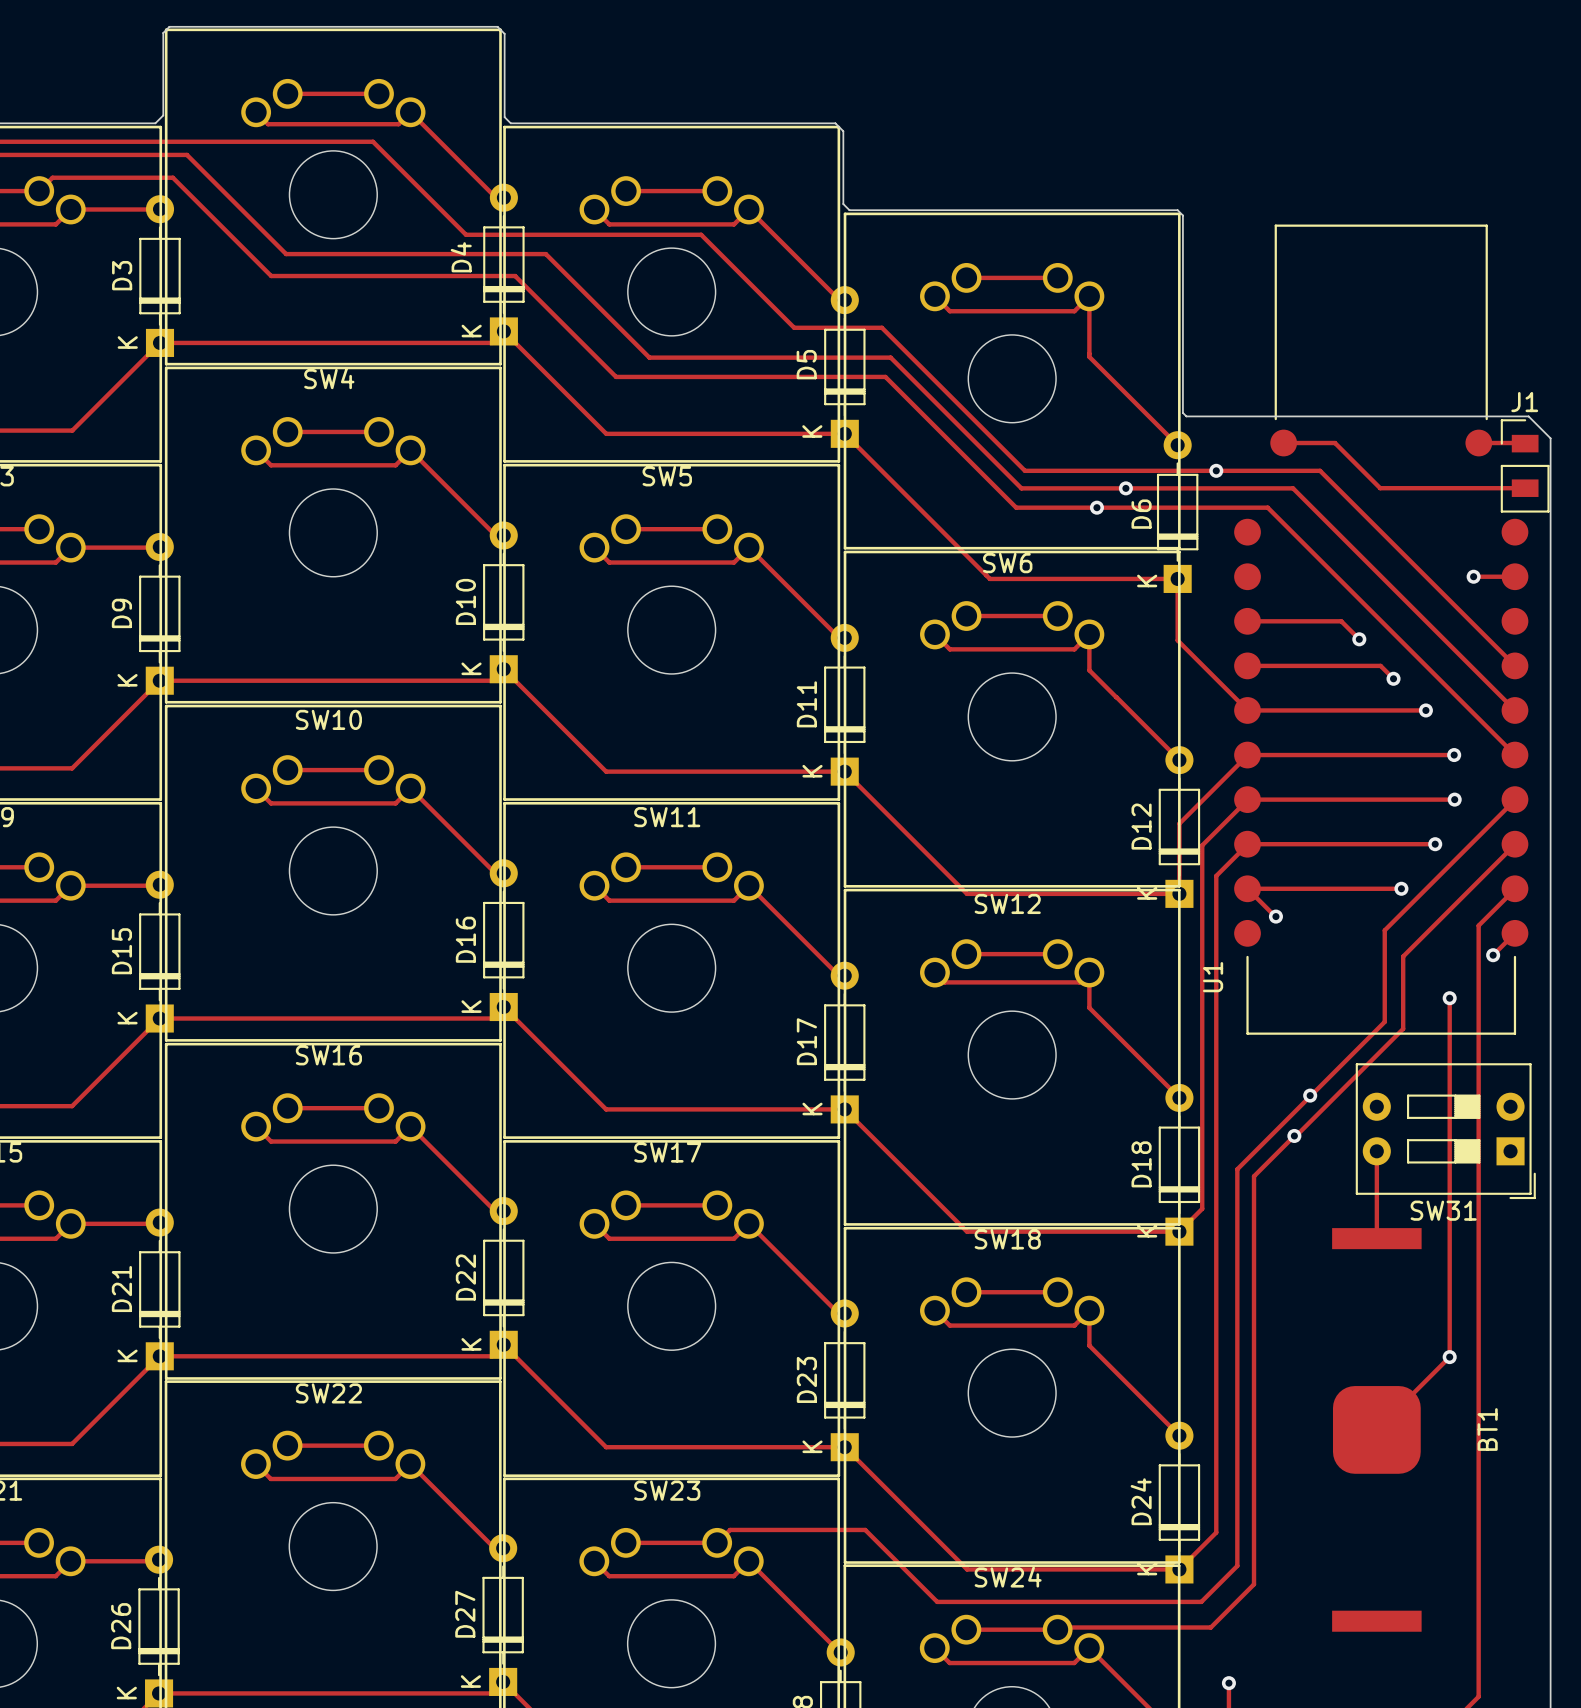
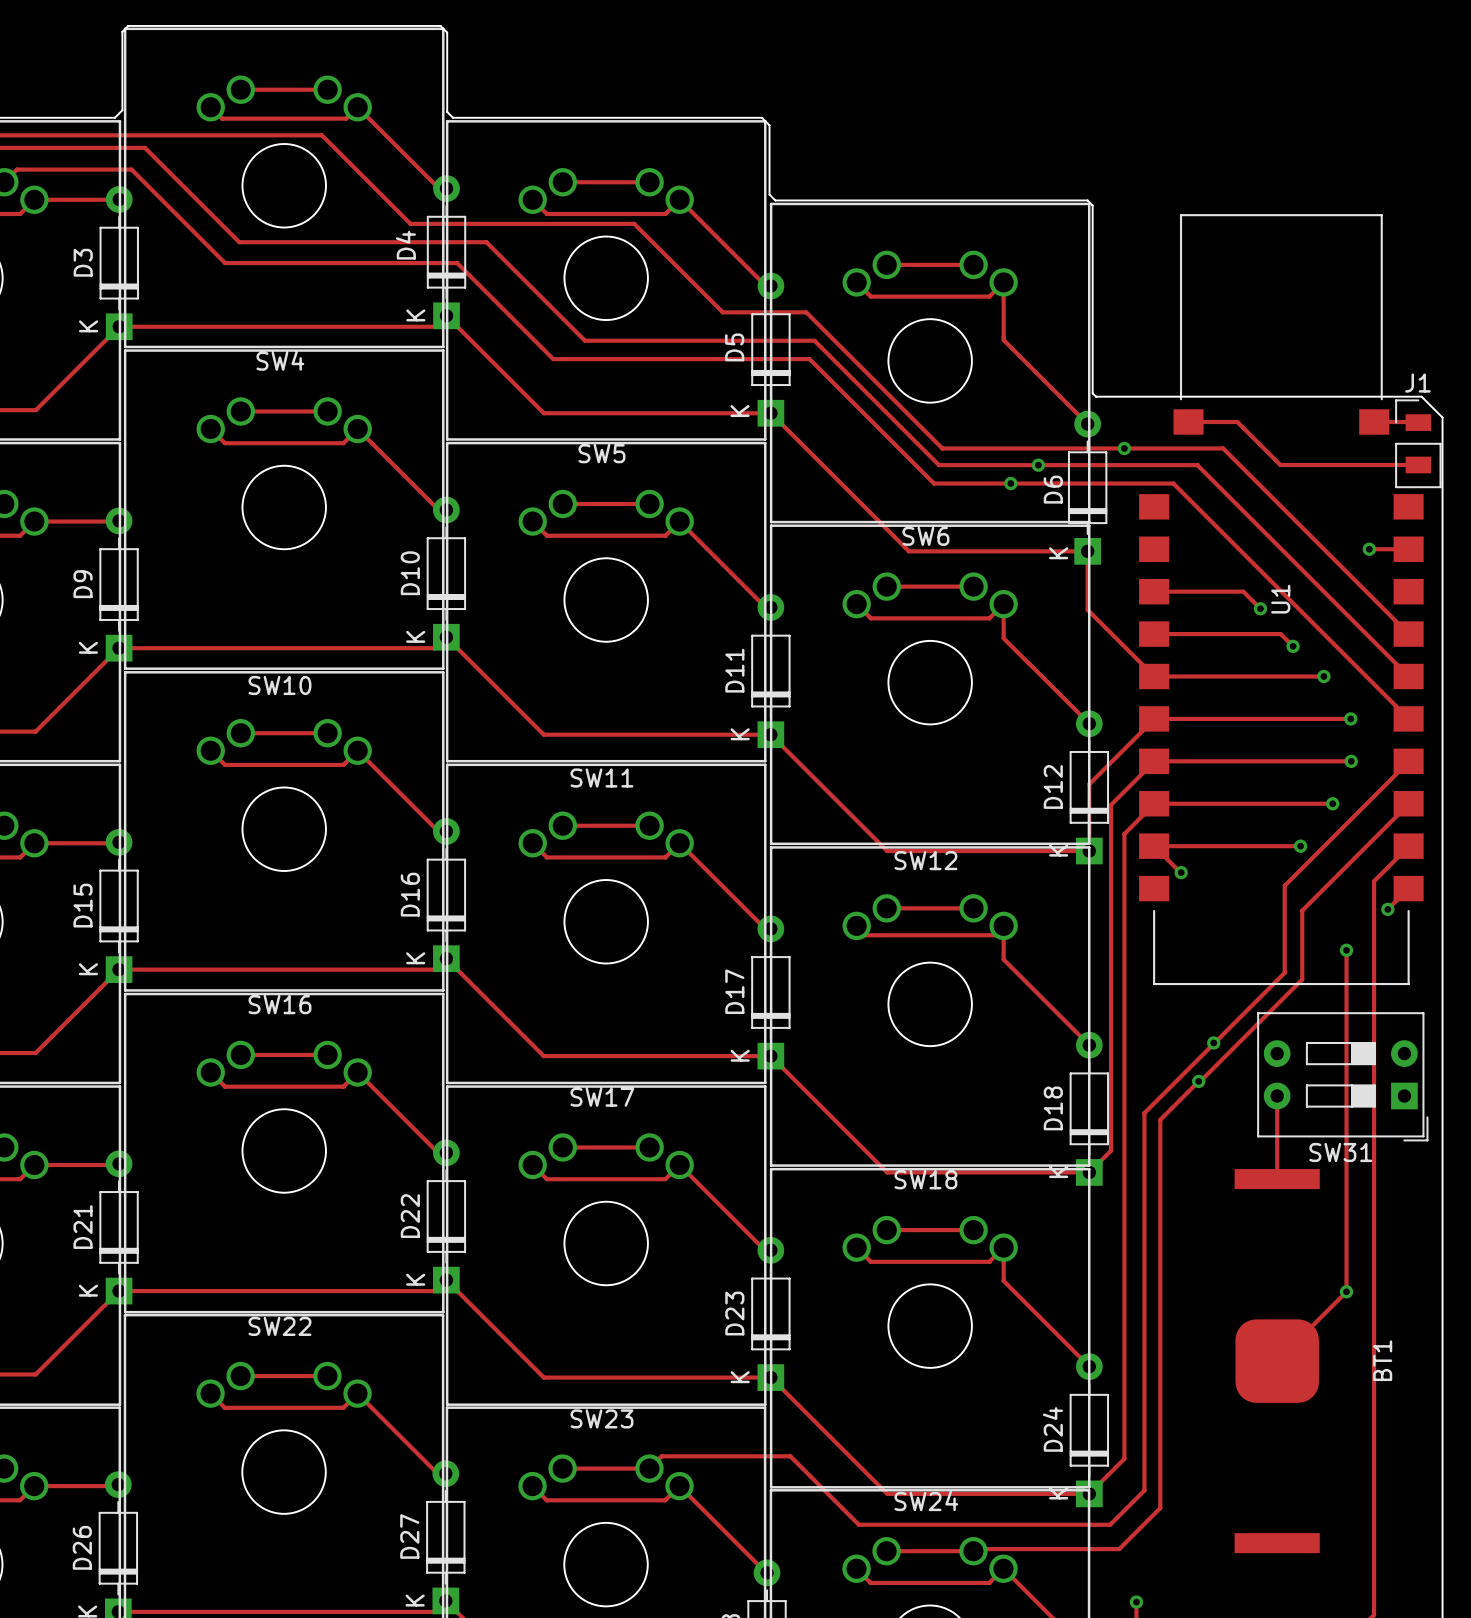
U1 footprint: [1234, 224, 1529, 1035] -> [1139, 214, 1424, 986]
U1 name position: U1 (1213, 977) -> U1 (1280, 599)

